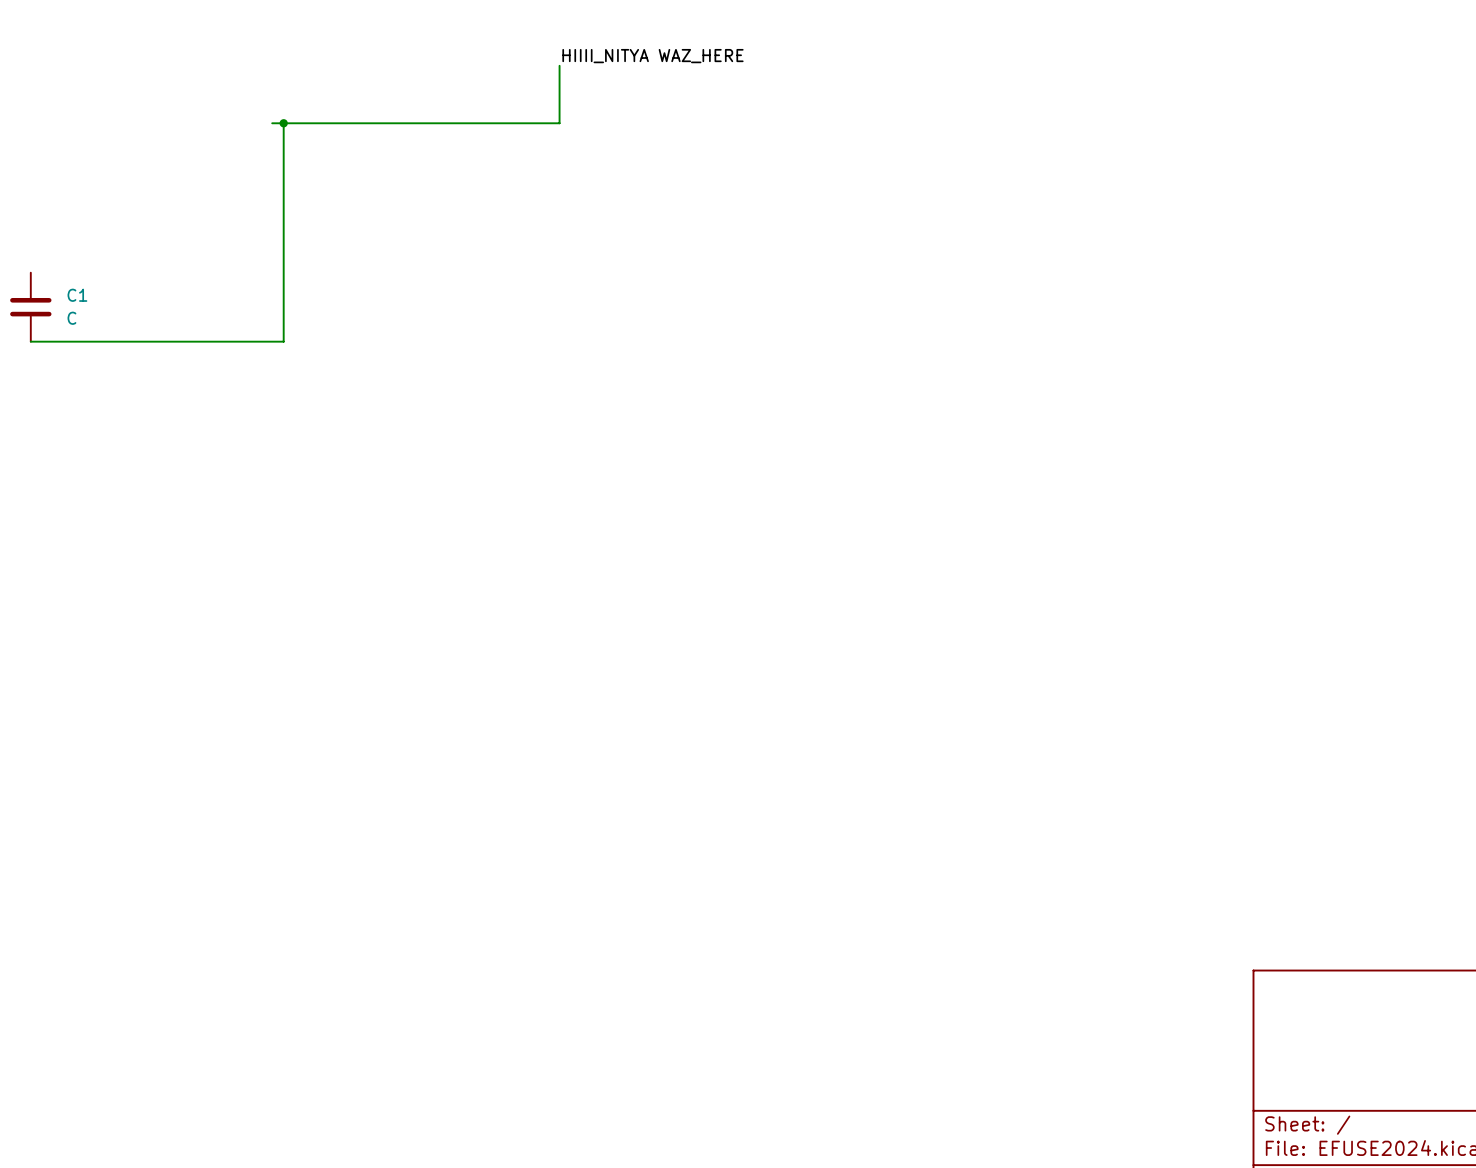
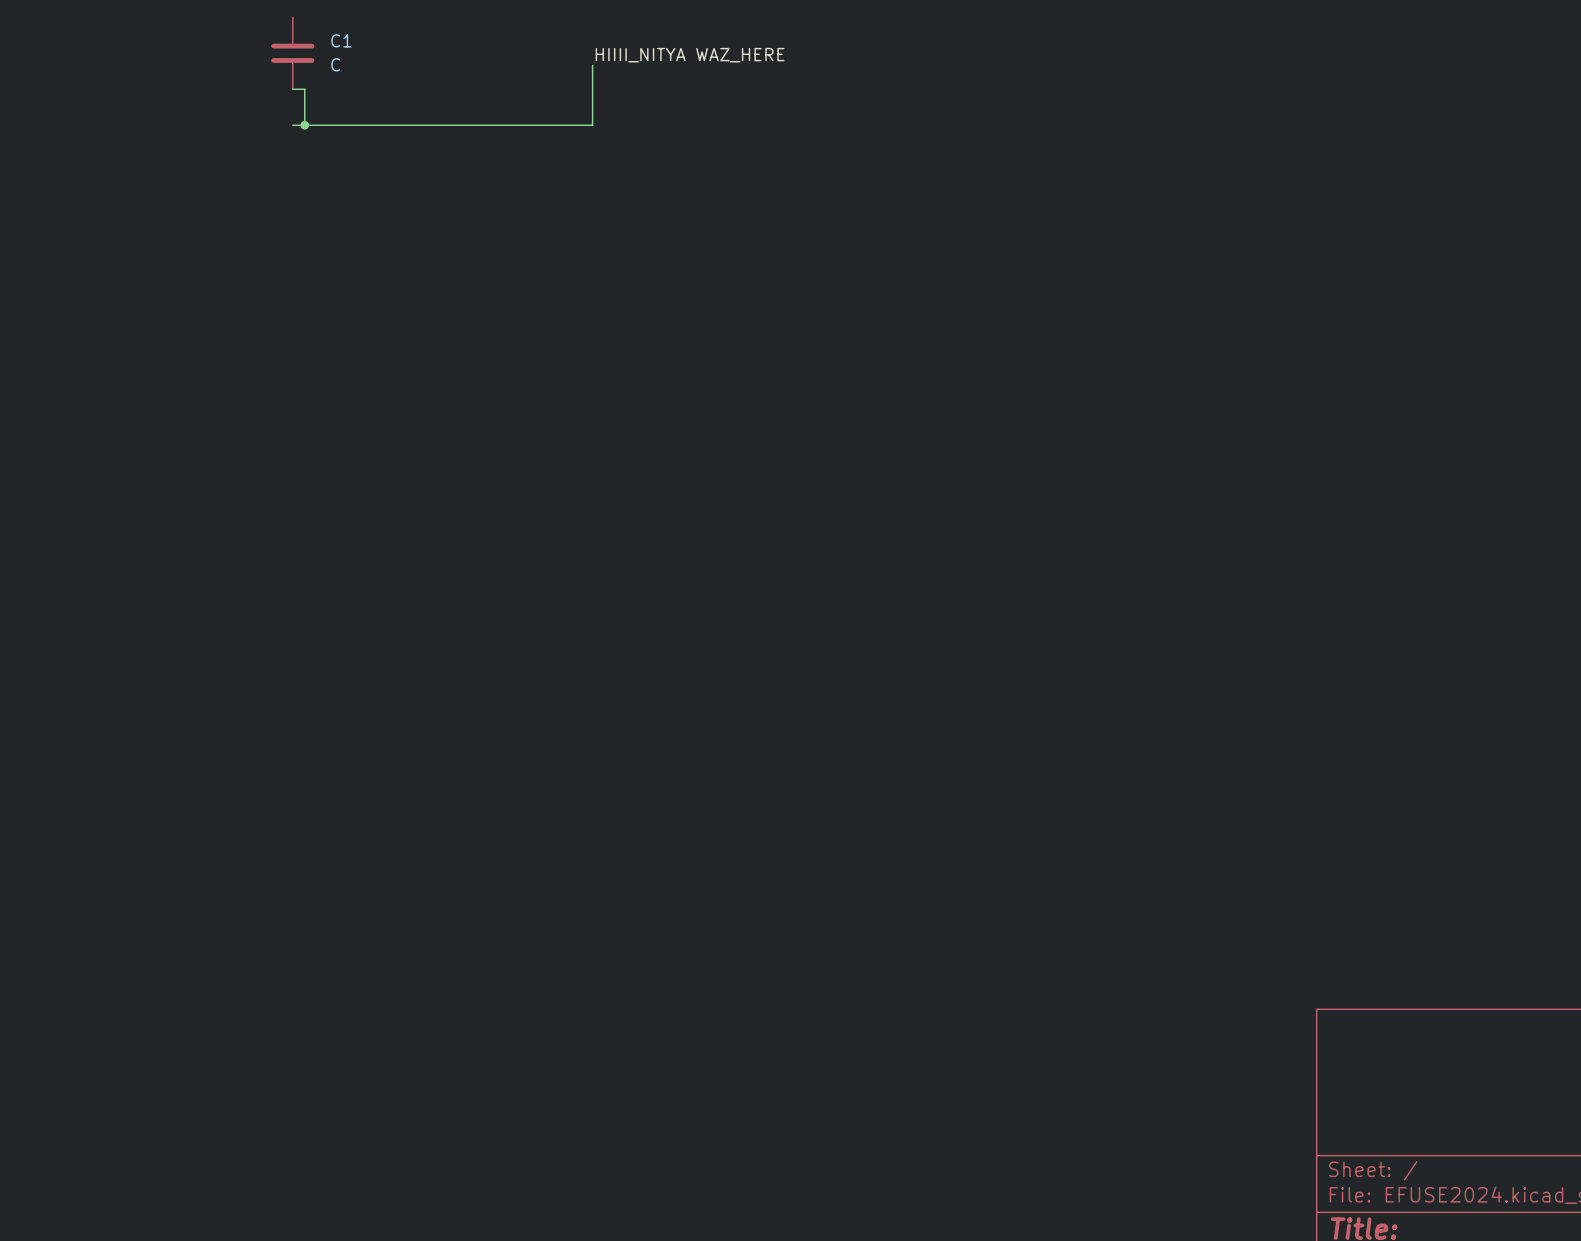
wire: (283, 123) (283, 341) (30, 341) -> (304, 125) (304, 89) (292, 89)
C1 position: (30, 307) -> (292, 53)

